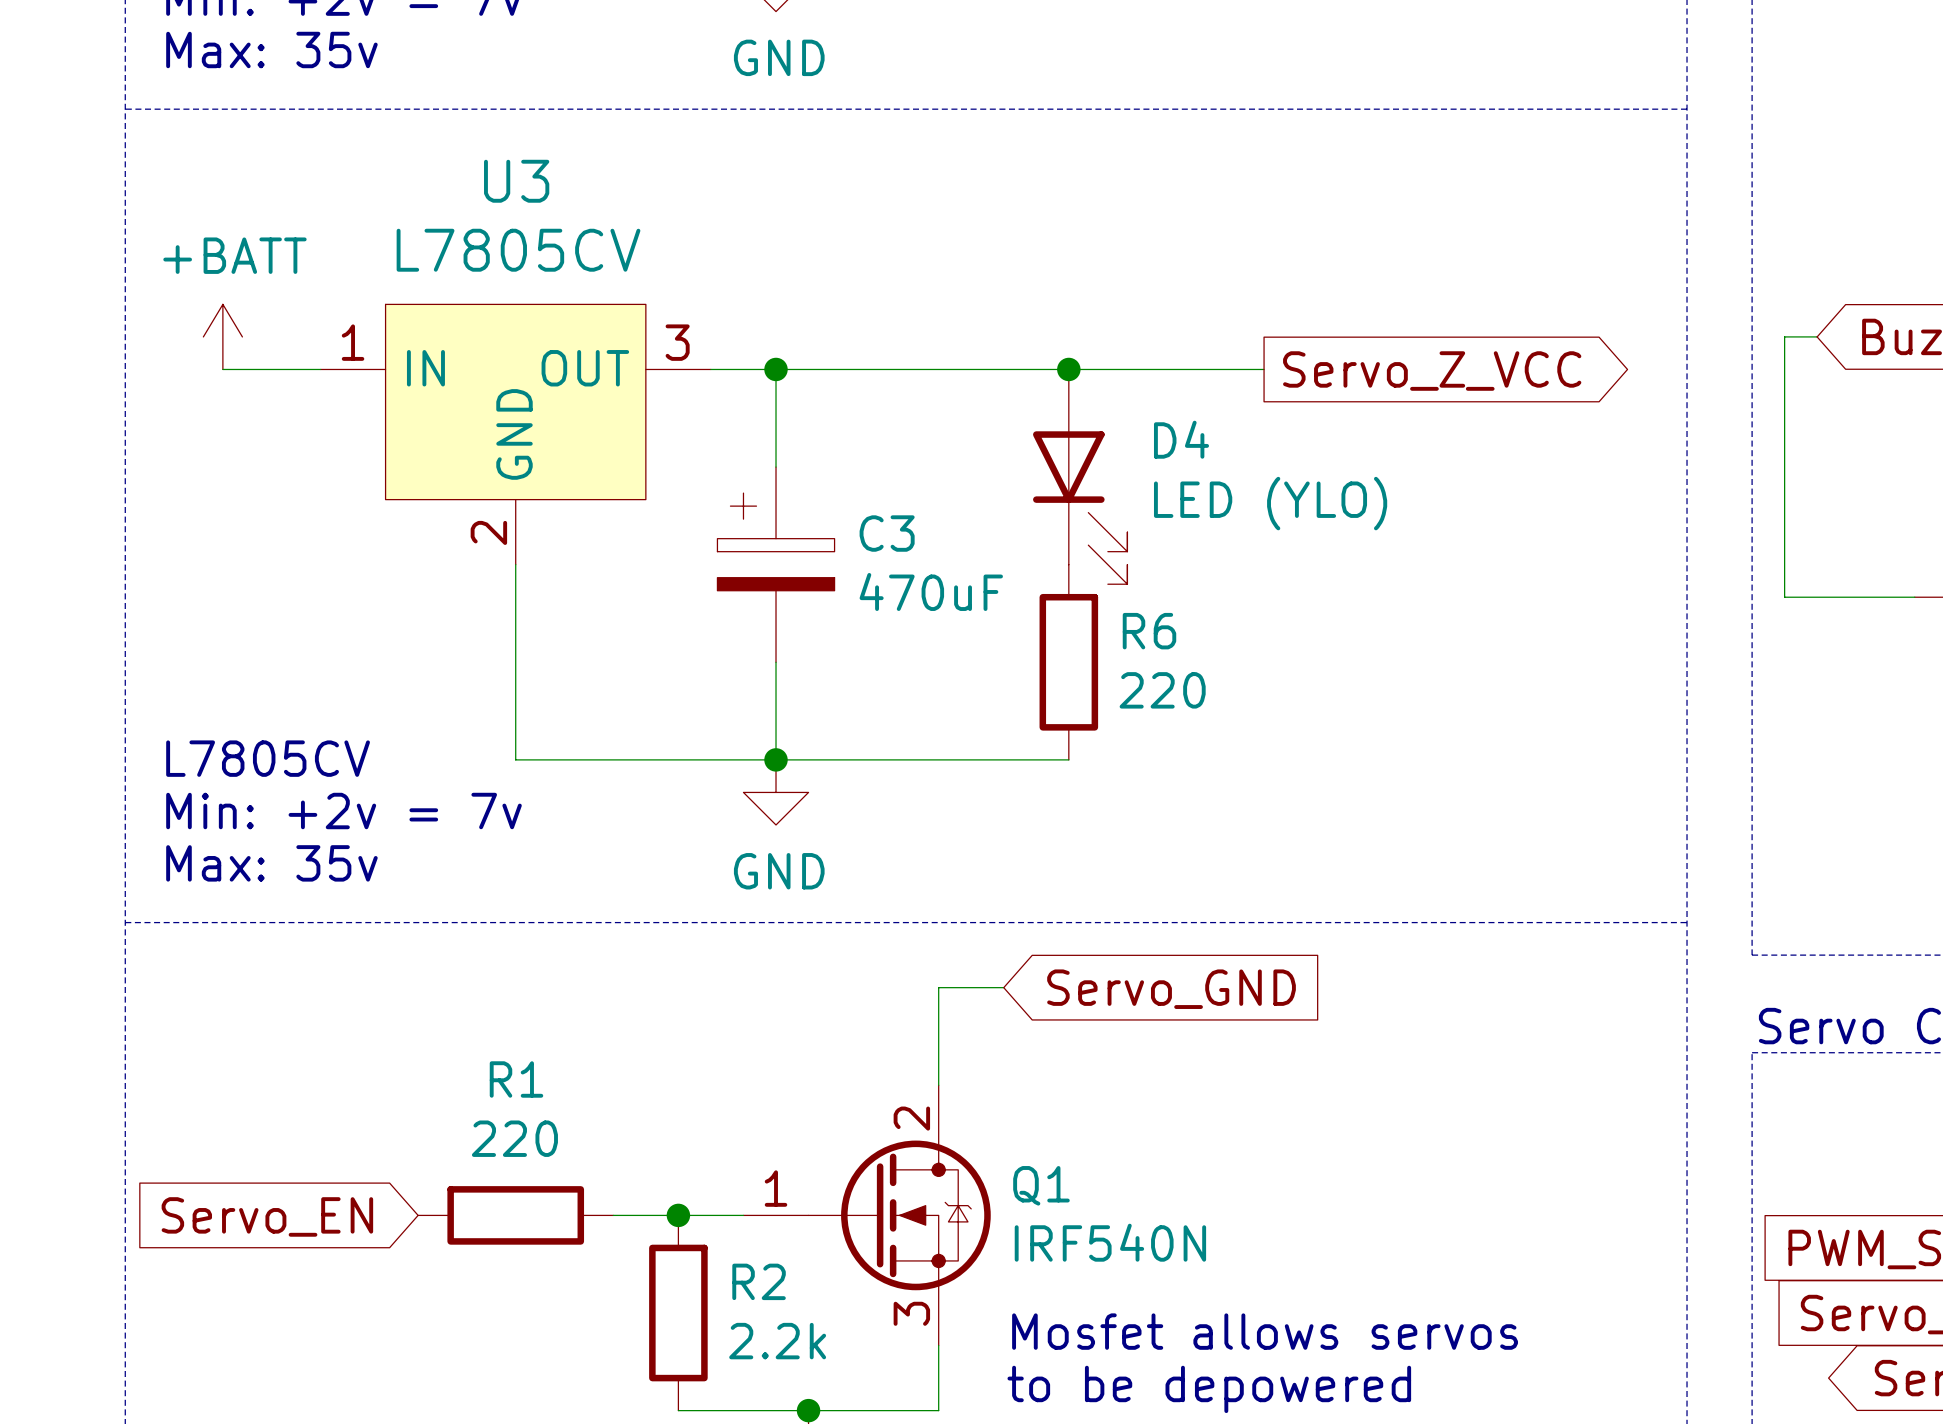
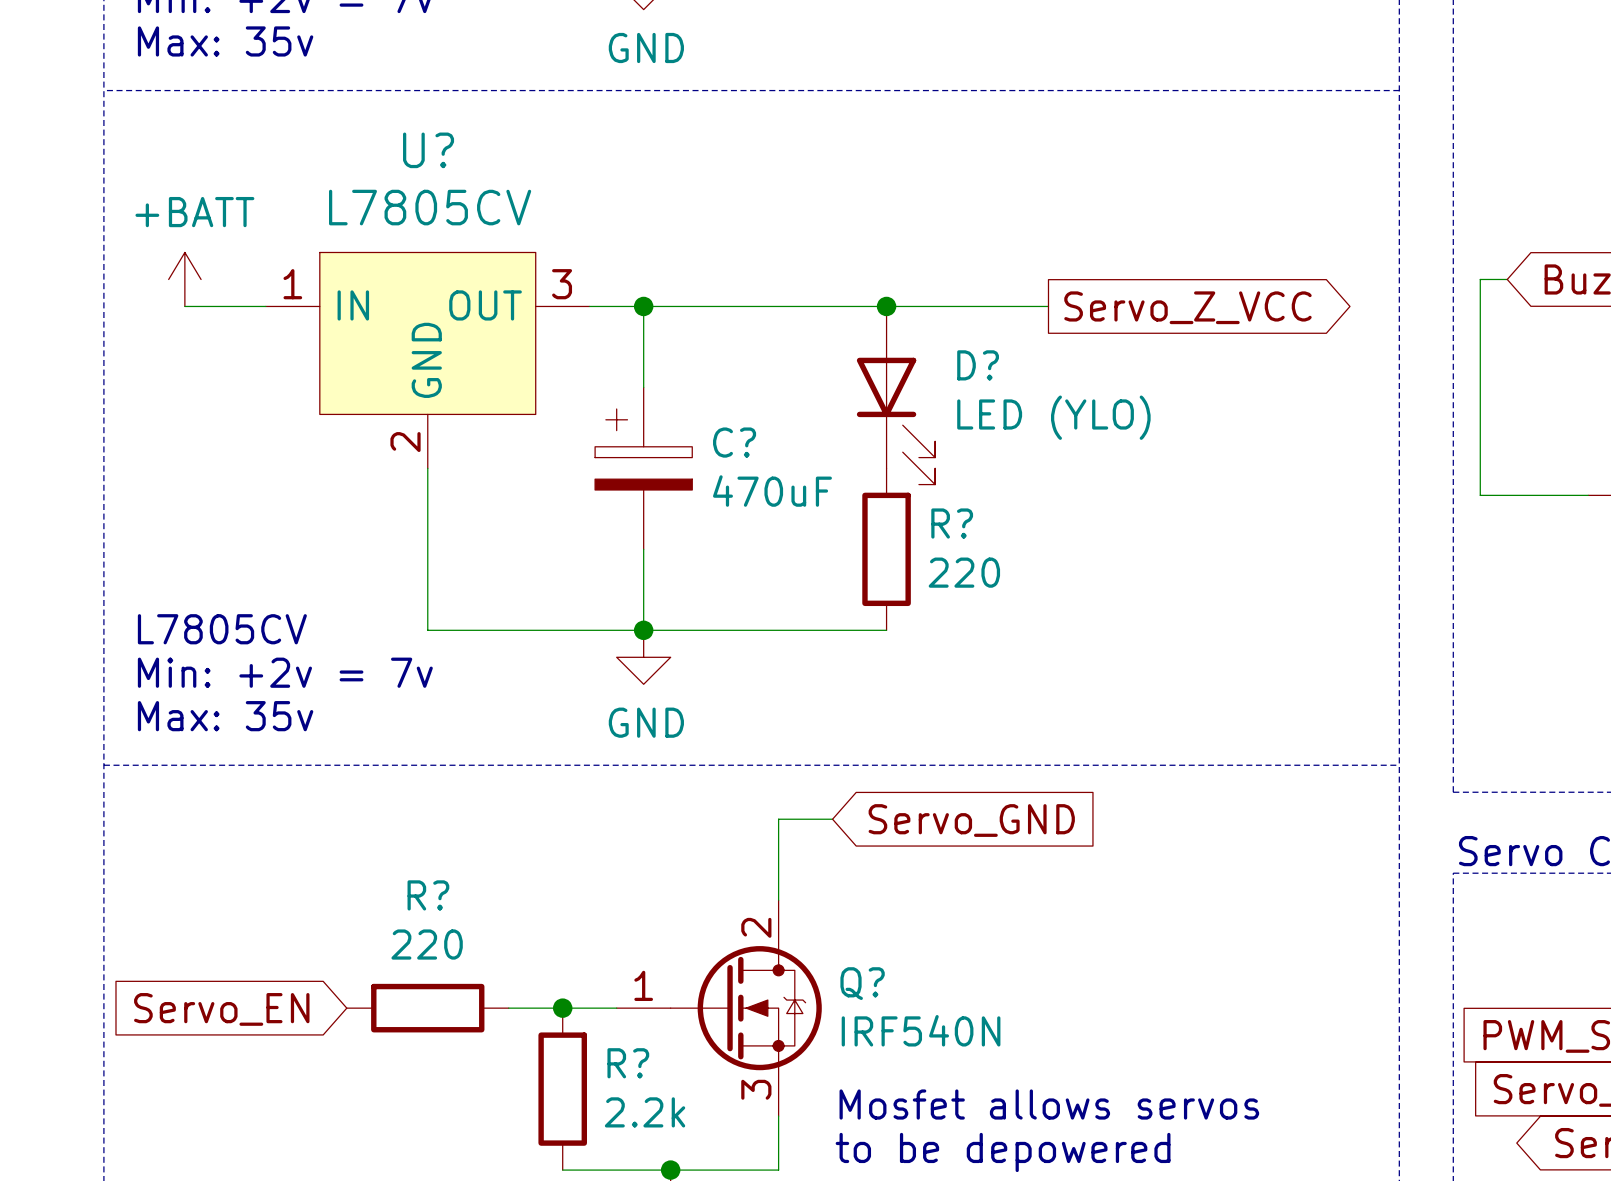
U3 name: U3 (516, 181) -> U? (428, 150)
D4 name: D4 (1181, 439) -> D? (978, 365)
C3 name: C3 (887, 533) -> C? (734, 442)
R6 name: R6 (1149, 631) -> R? (952, 523)
R1 name: R1 (516, 1079) -> R? (428, 895)
Q1 name: Q1 (1041, 1185) -> Q? (862, 983)
R2 name: R2 (759, 1281) -> R? (628, 1063)

